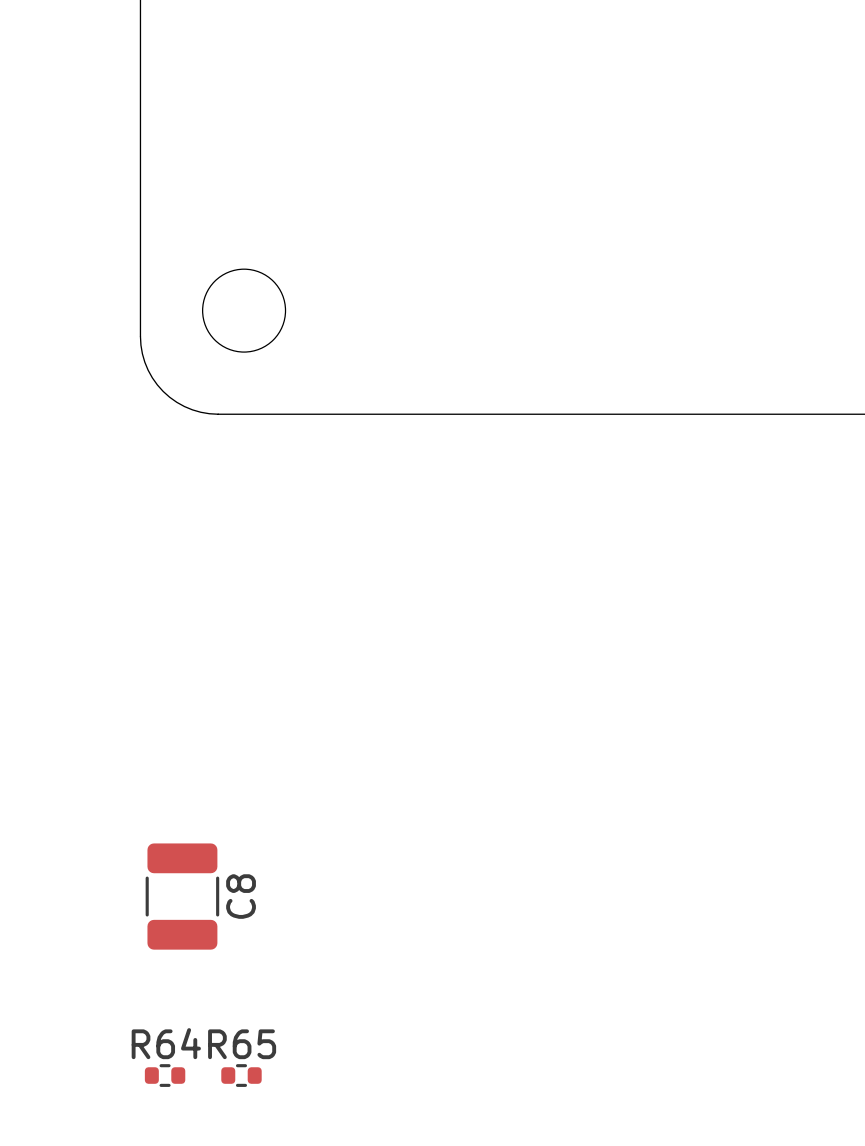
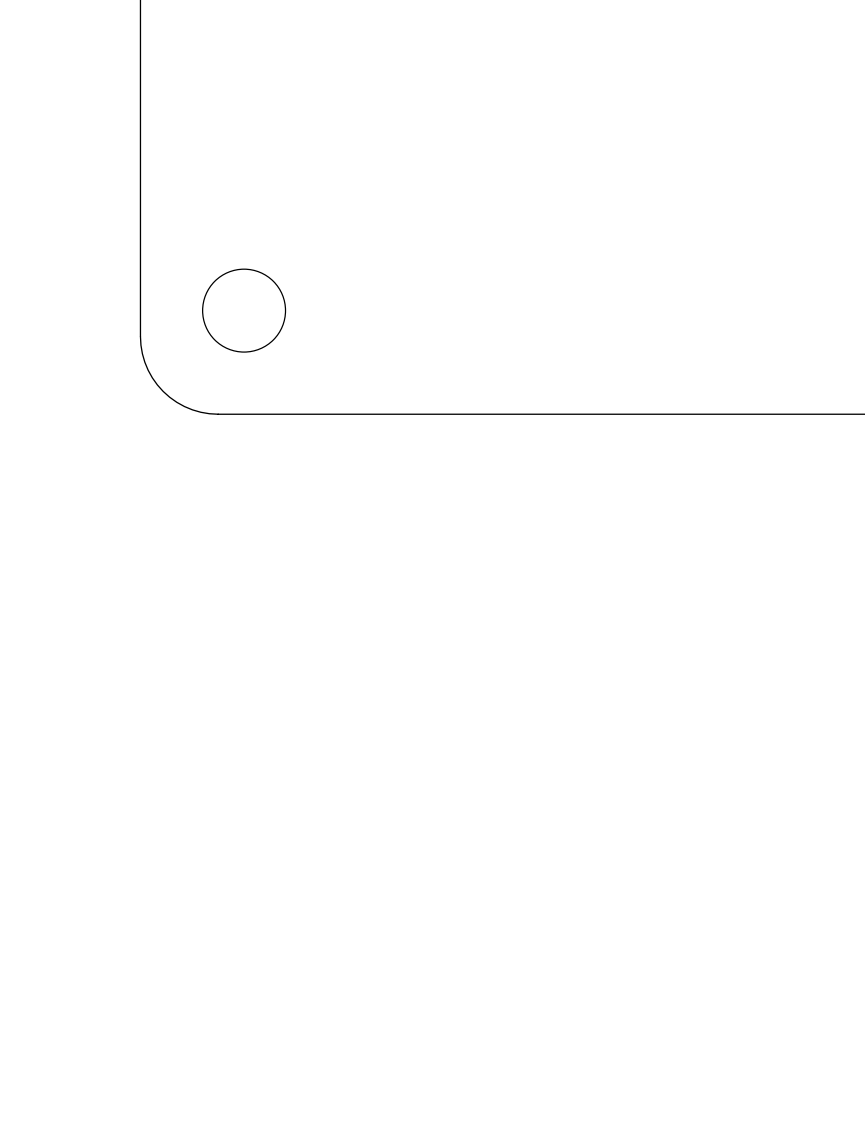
C8: (182, 896) -> none
R64: (165, 1075) -> none
R65: (241, 1075) -> none

